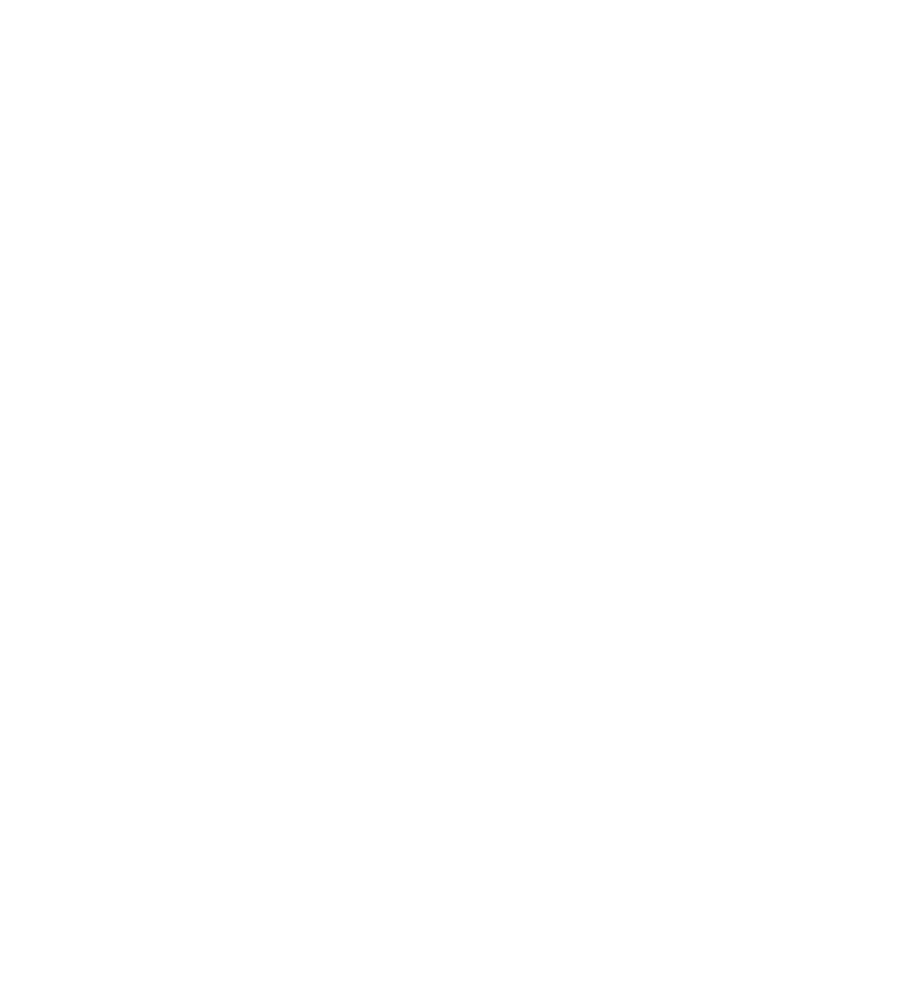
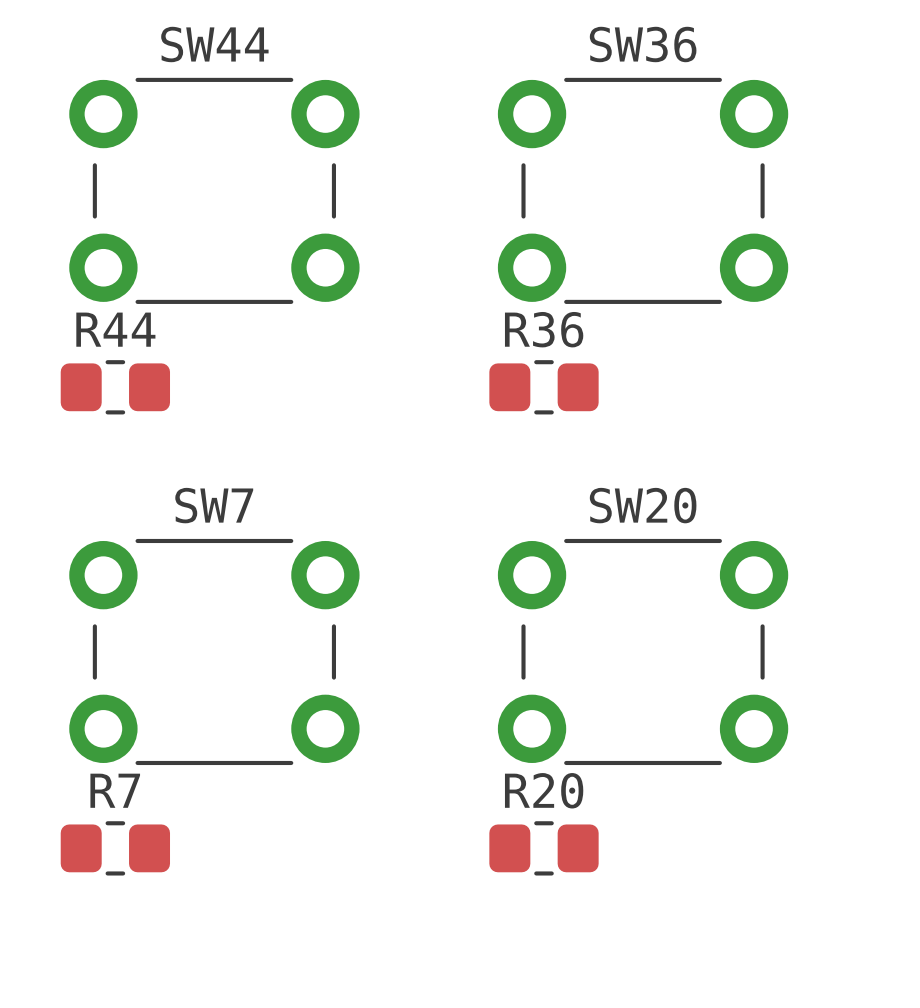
SW44: none -> (214, 190)
SW36: none -> (643, 190)
R44: none -> (115, 387)
R36: none -> (544, 387)
SW7: none -> (214, 651)
SW20: none -> (643, 651)
R7: none -> (115, 848)
R20: none -> (544, 848)

